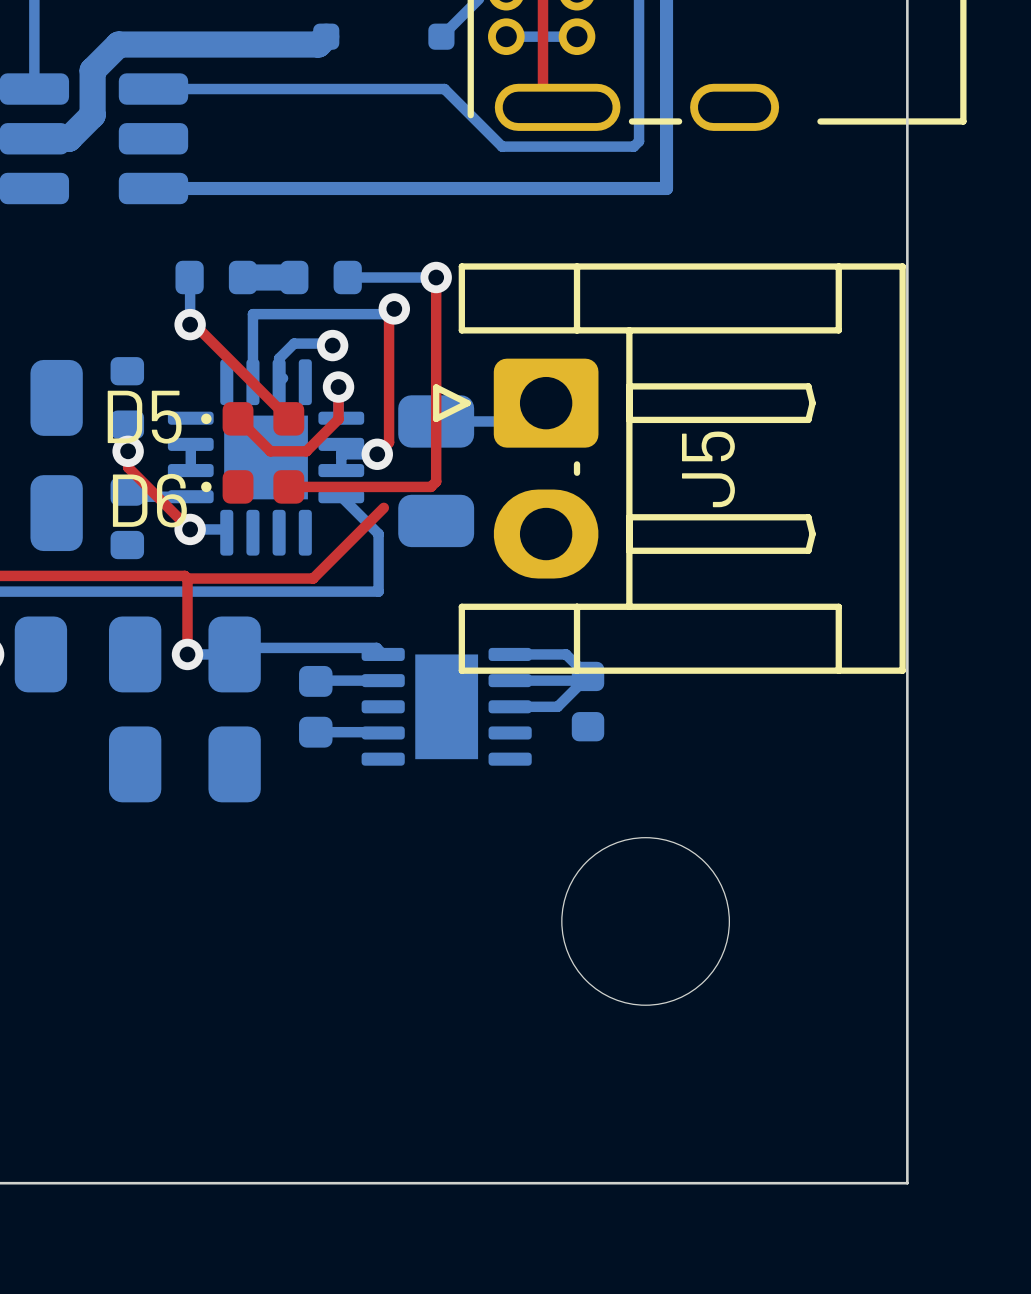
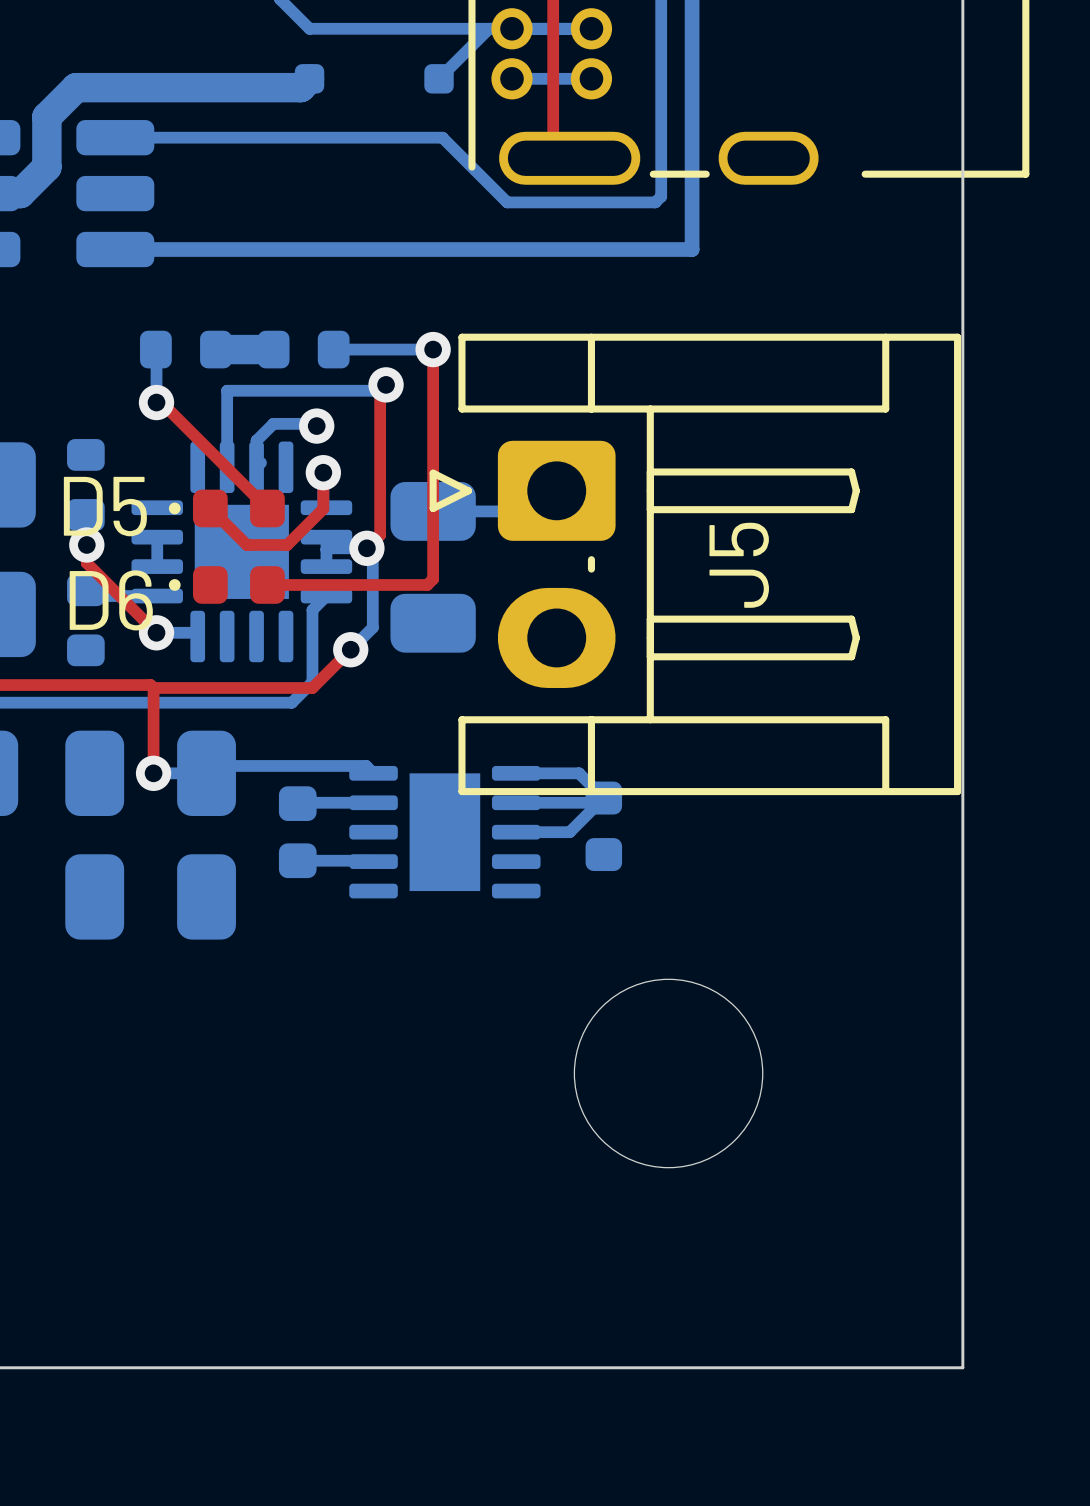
bottom track: none -> (366, 548) (372, 554) (372, 627) (350, 649)
bottom track: (341, 496) (378, 534) (378, 591) (310, 591) -> (326, 596) (312, 610) (312, 682) (291, 702)
top track: (383, 507) (313, 578) -> (350, 649) (312, 687) (294, 687)
via: none -> (350, 649)

